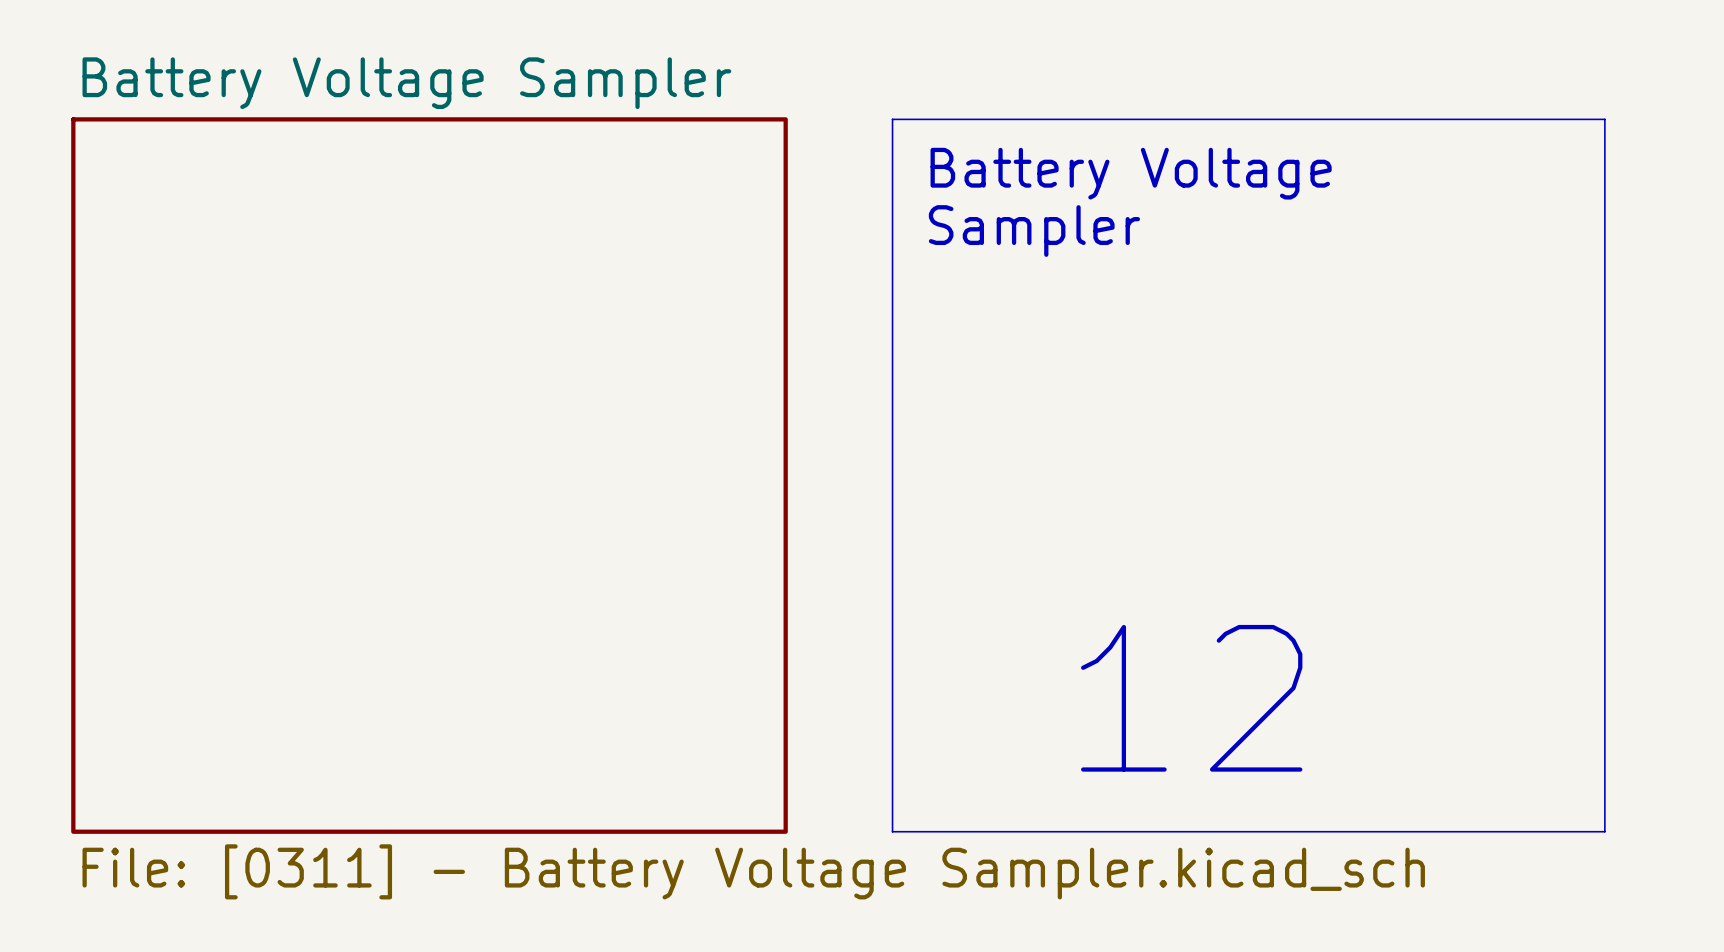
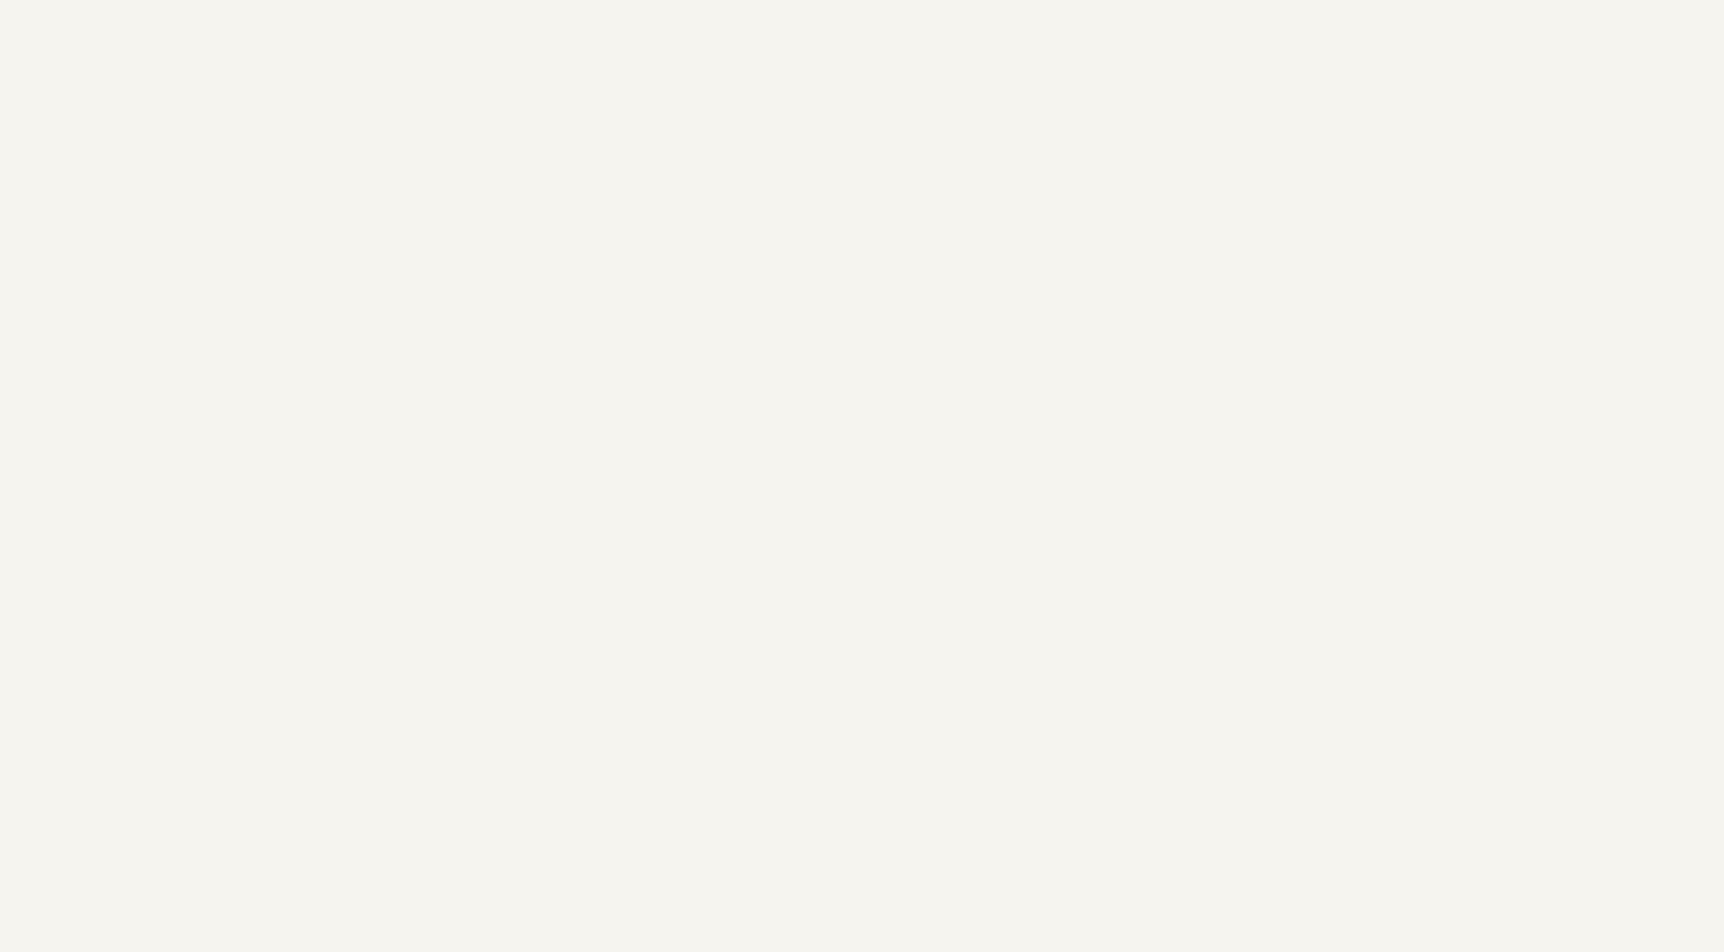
line: (892, 119) (1604, 119) (1604, 831) (892, 831) (892, 119) -> none
text: Battery Voltage (1131, 173) -> none
text: Sampler (1034, 231) -> none
sheet Battery Voltage Sampler: File: [0311] - Battery Voltage Sampler.kicad_sch (429, 475) -> none
text: 12 (1191, 698) -> none

